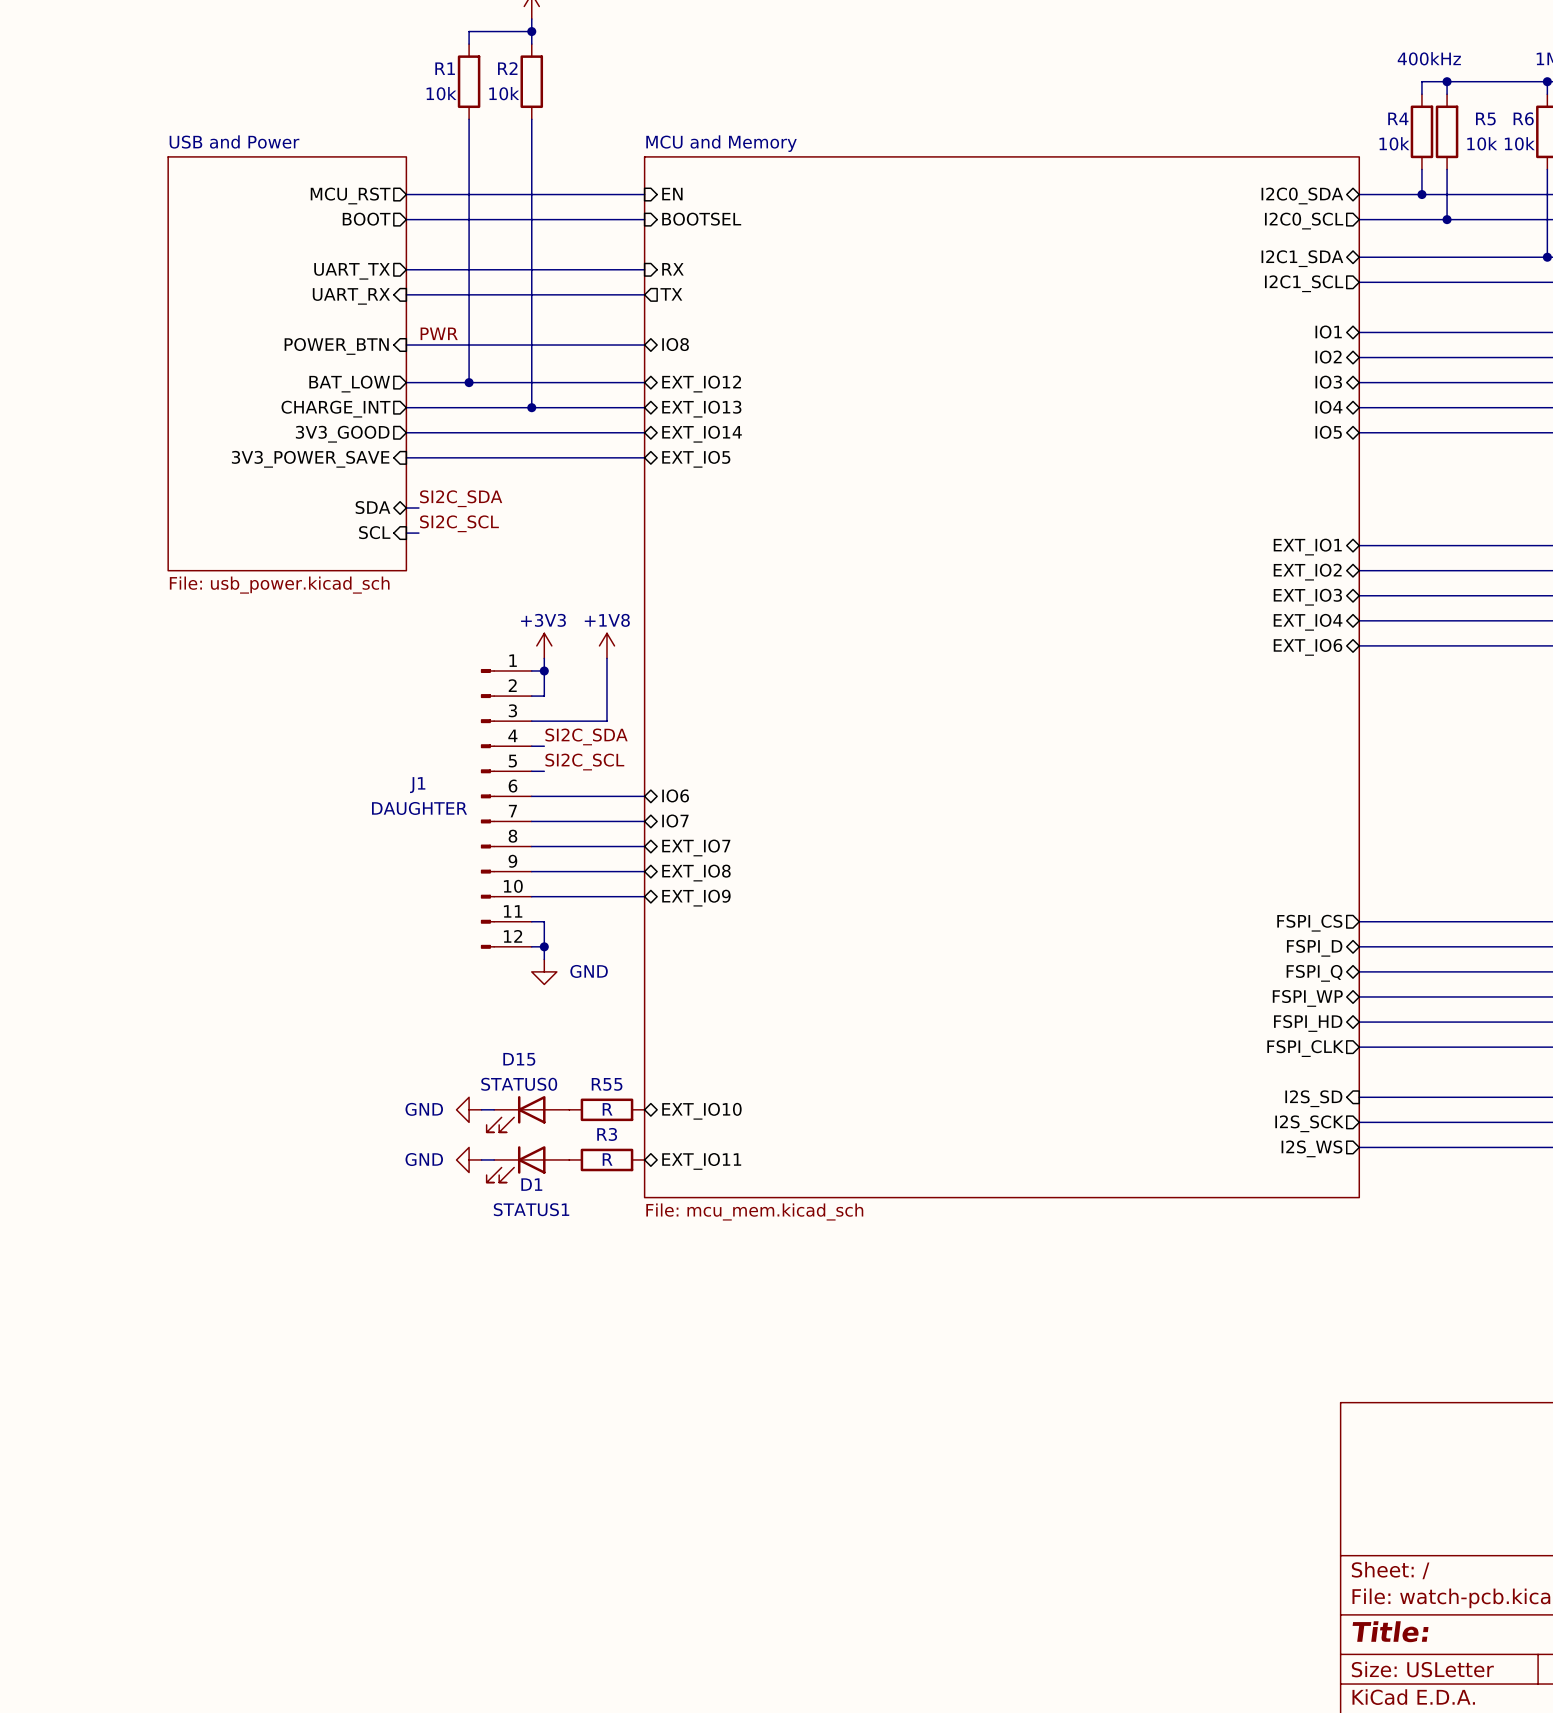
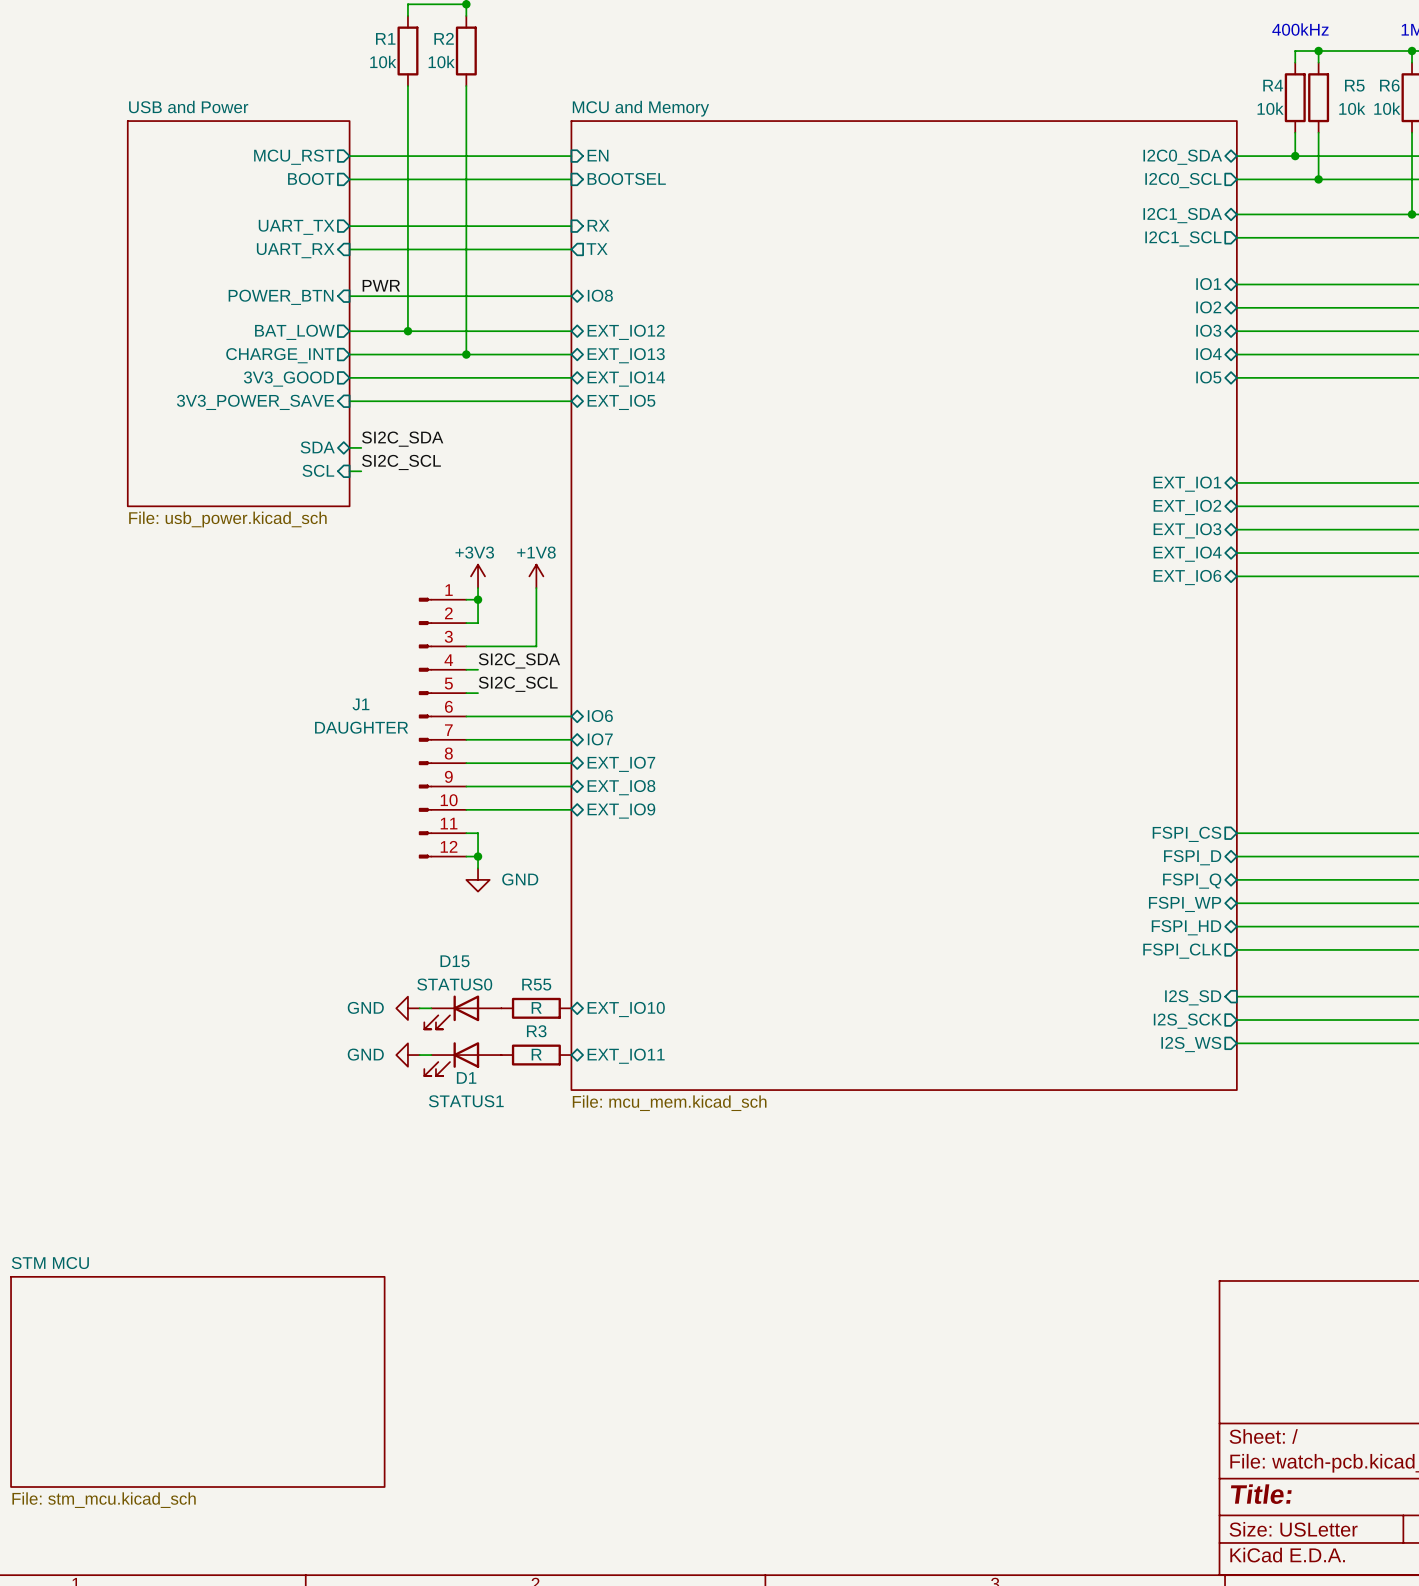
sheet STM MCU: none -> File: stm_mcu.kicad_sch (197, 1381)

